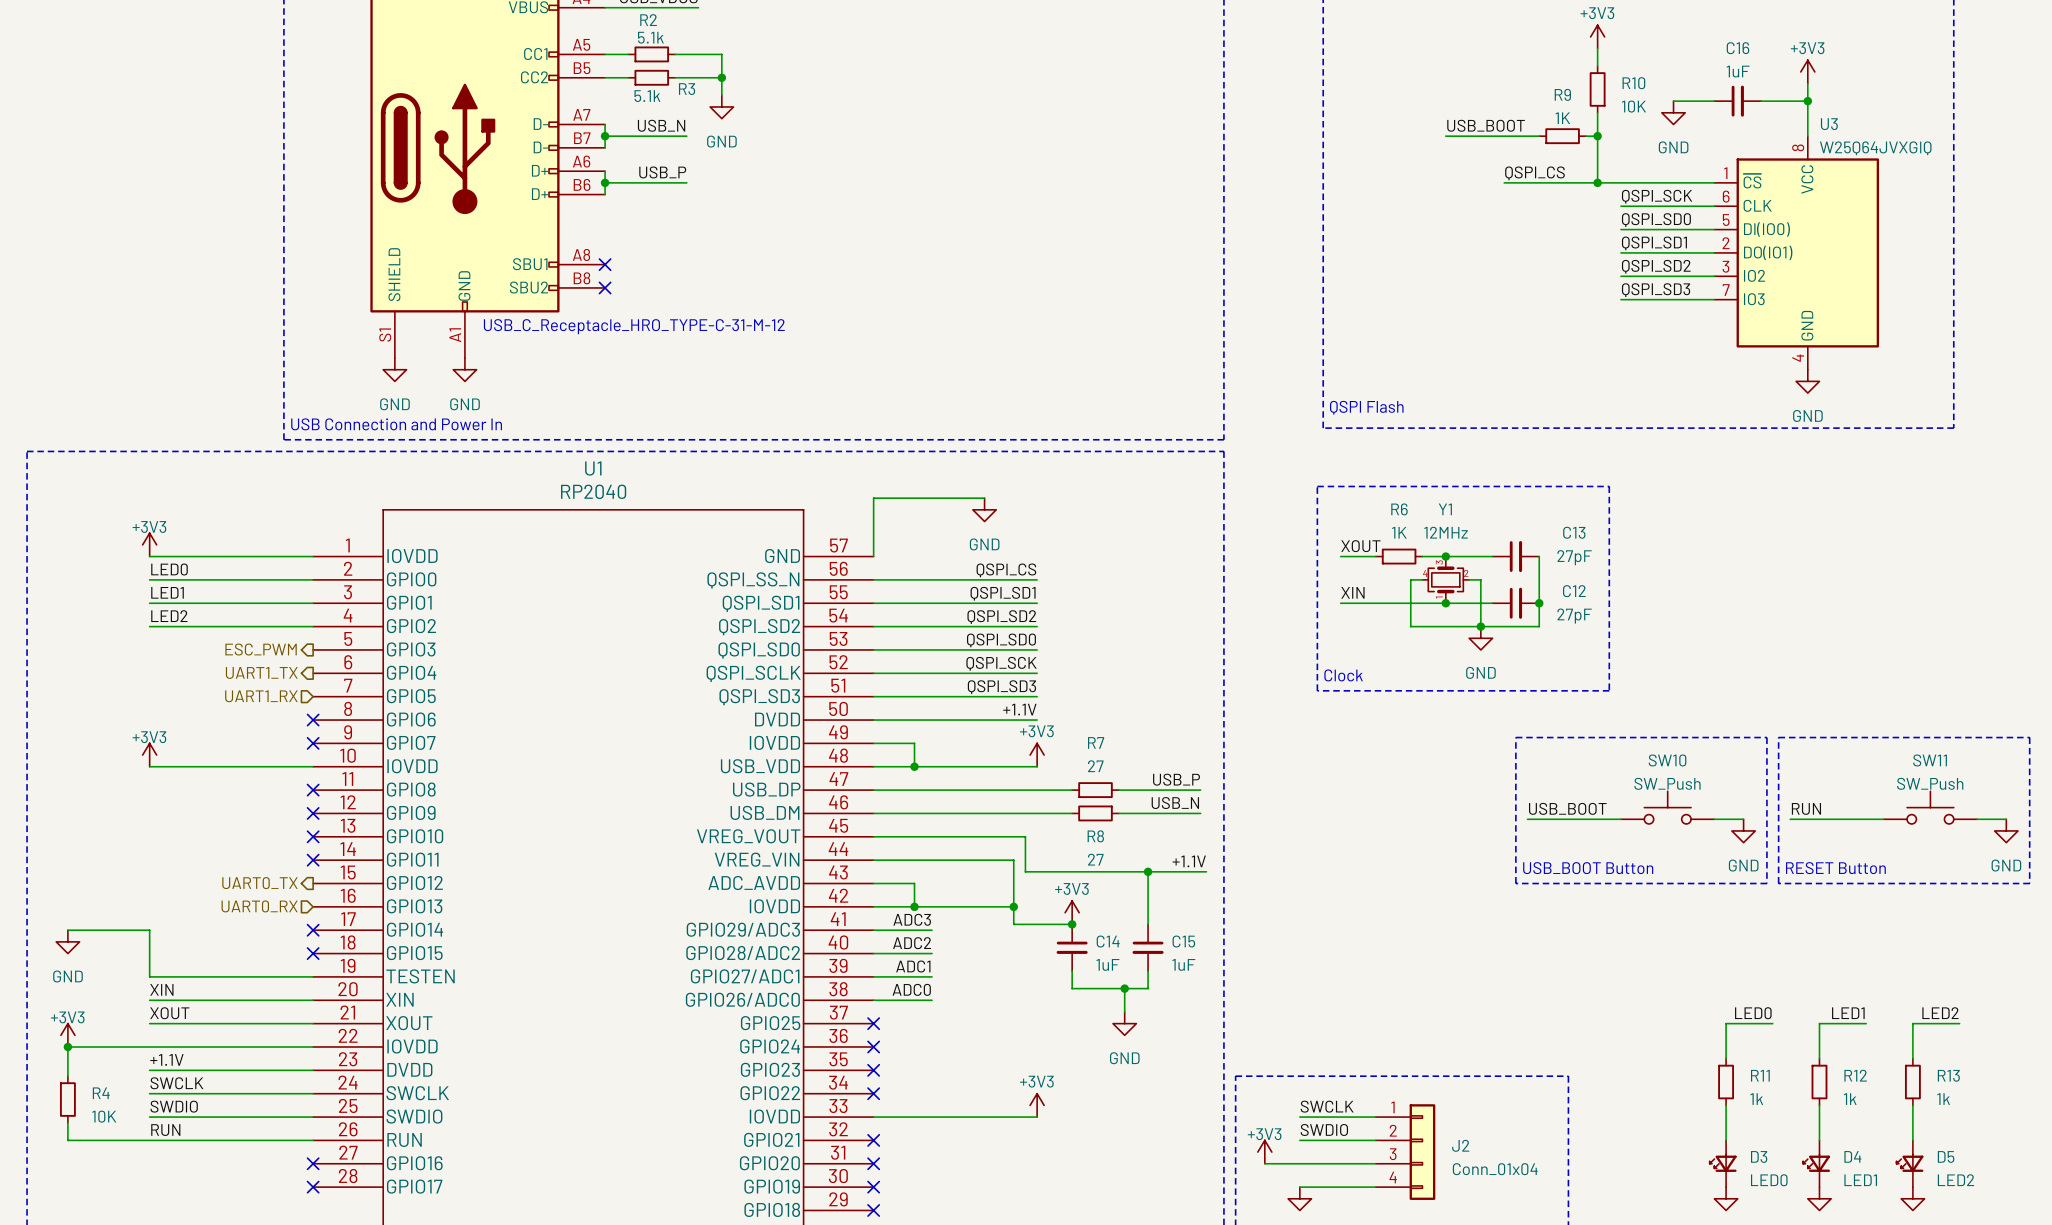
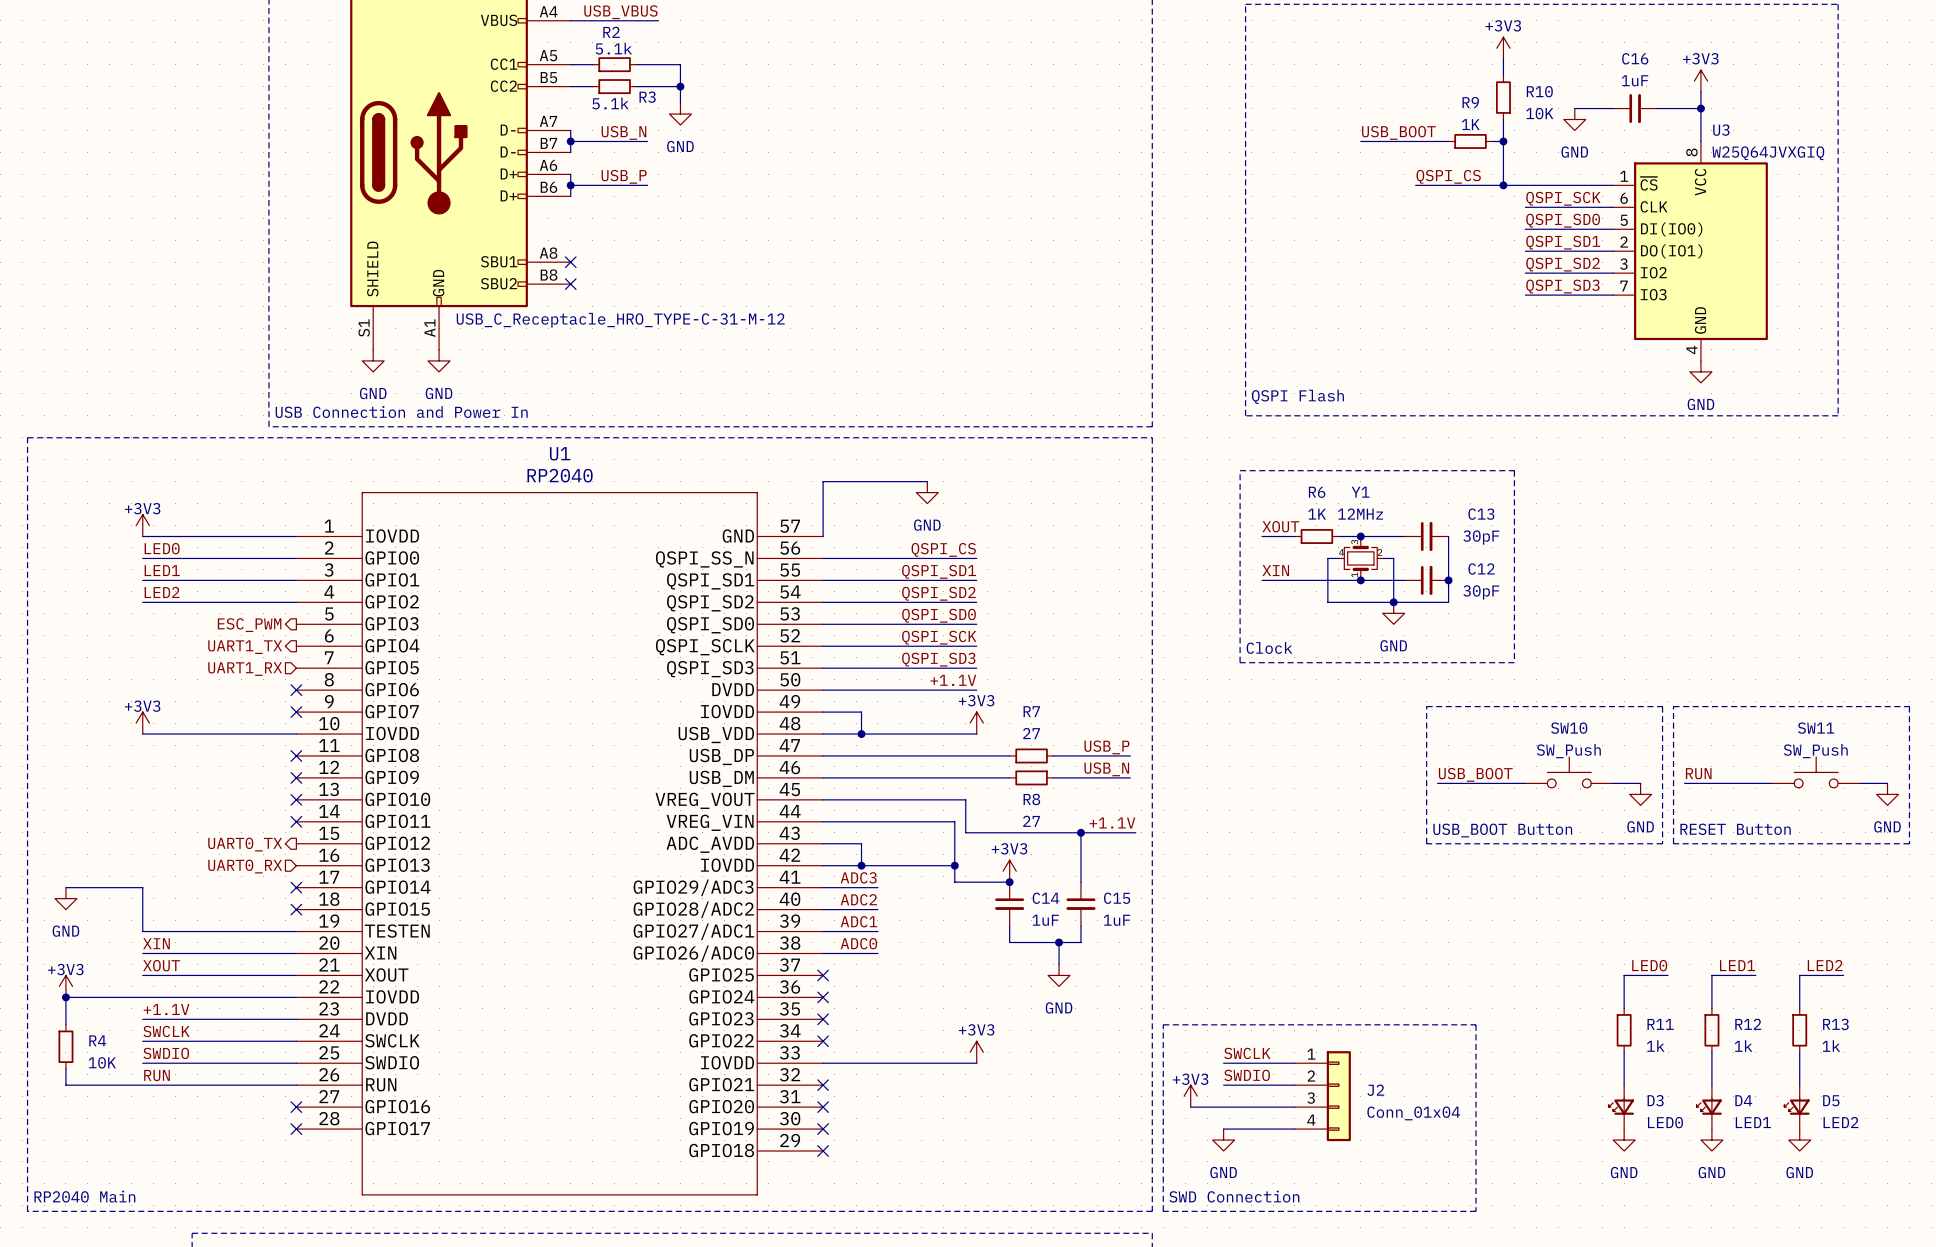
C13 value: 27pF (1574, 557) -> 30pF (1481, 537)
C12 value: 27pF (1574, 616) -> 30pF (1481, 592)

